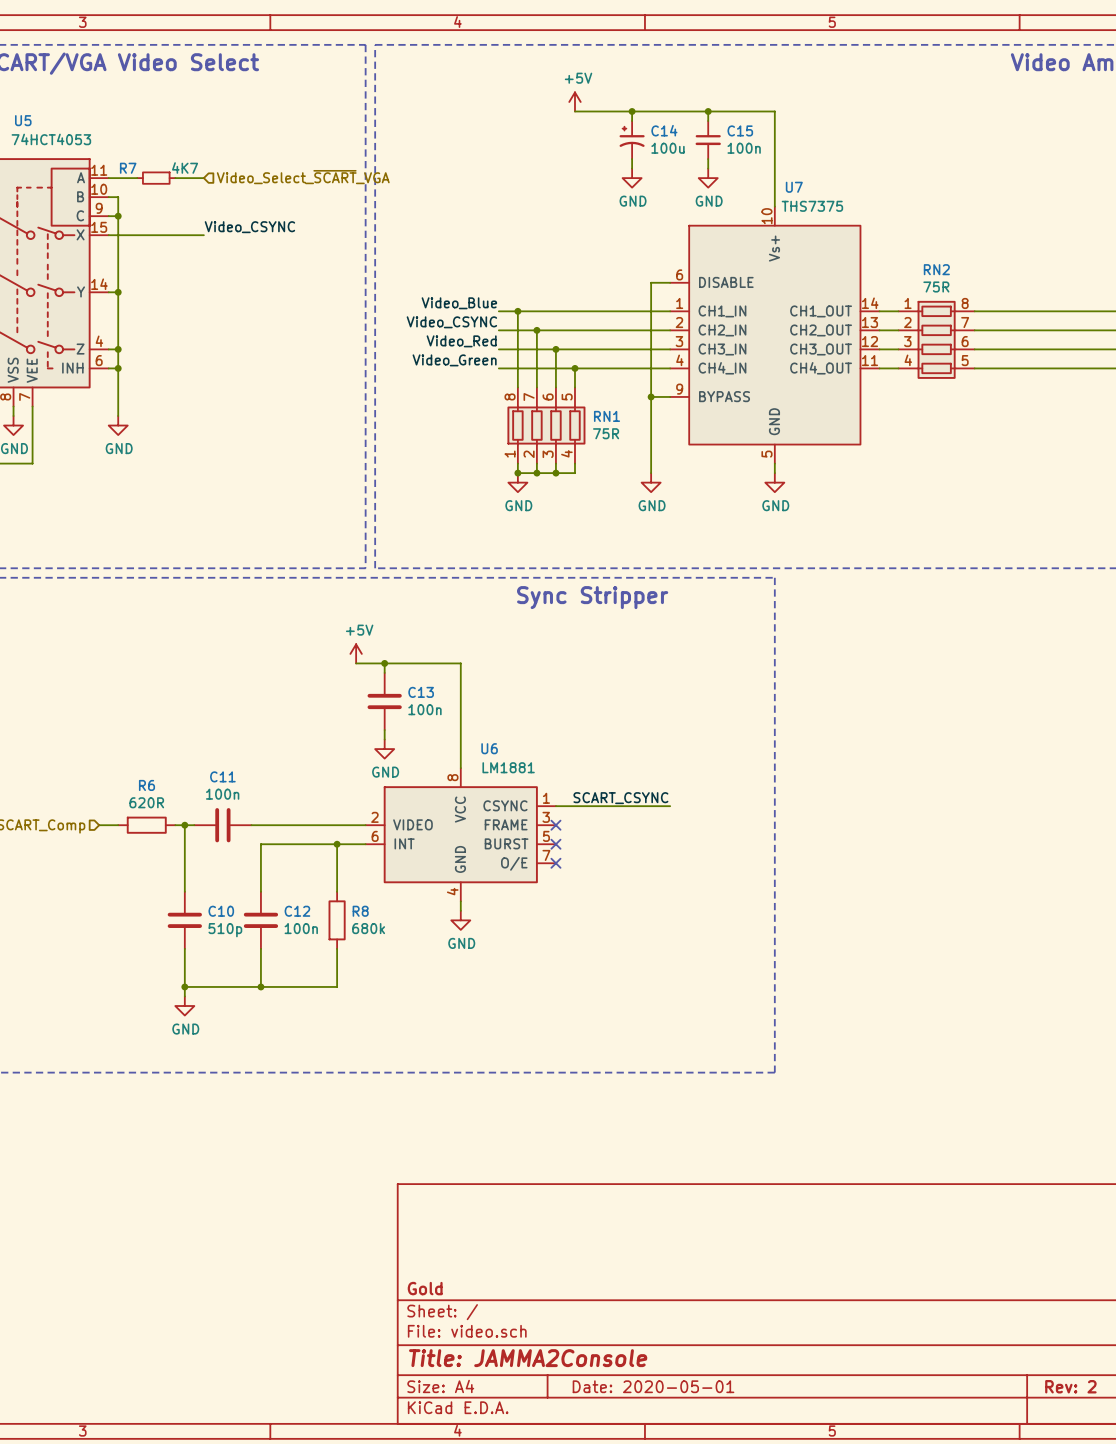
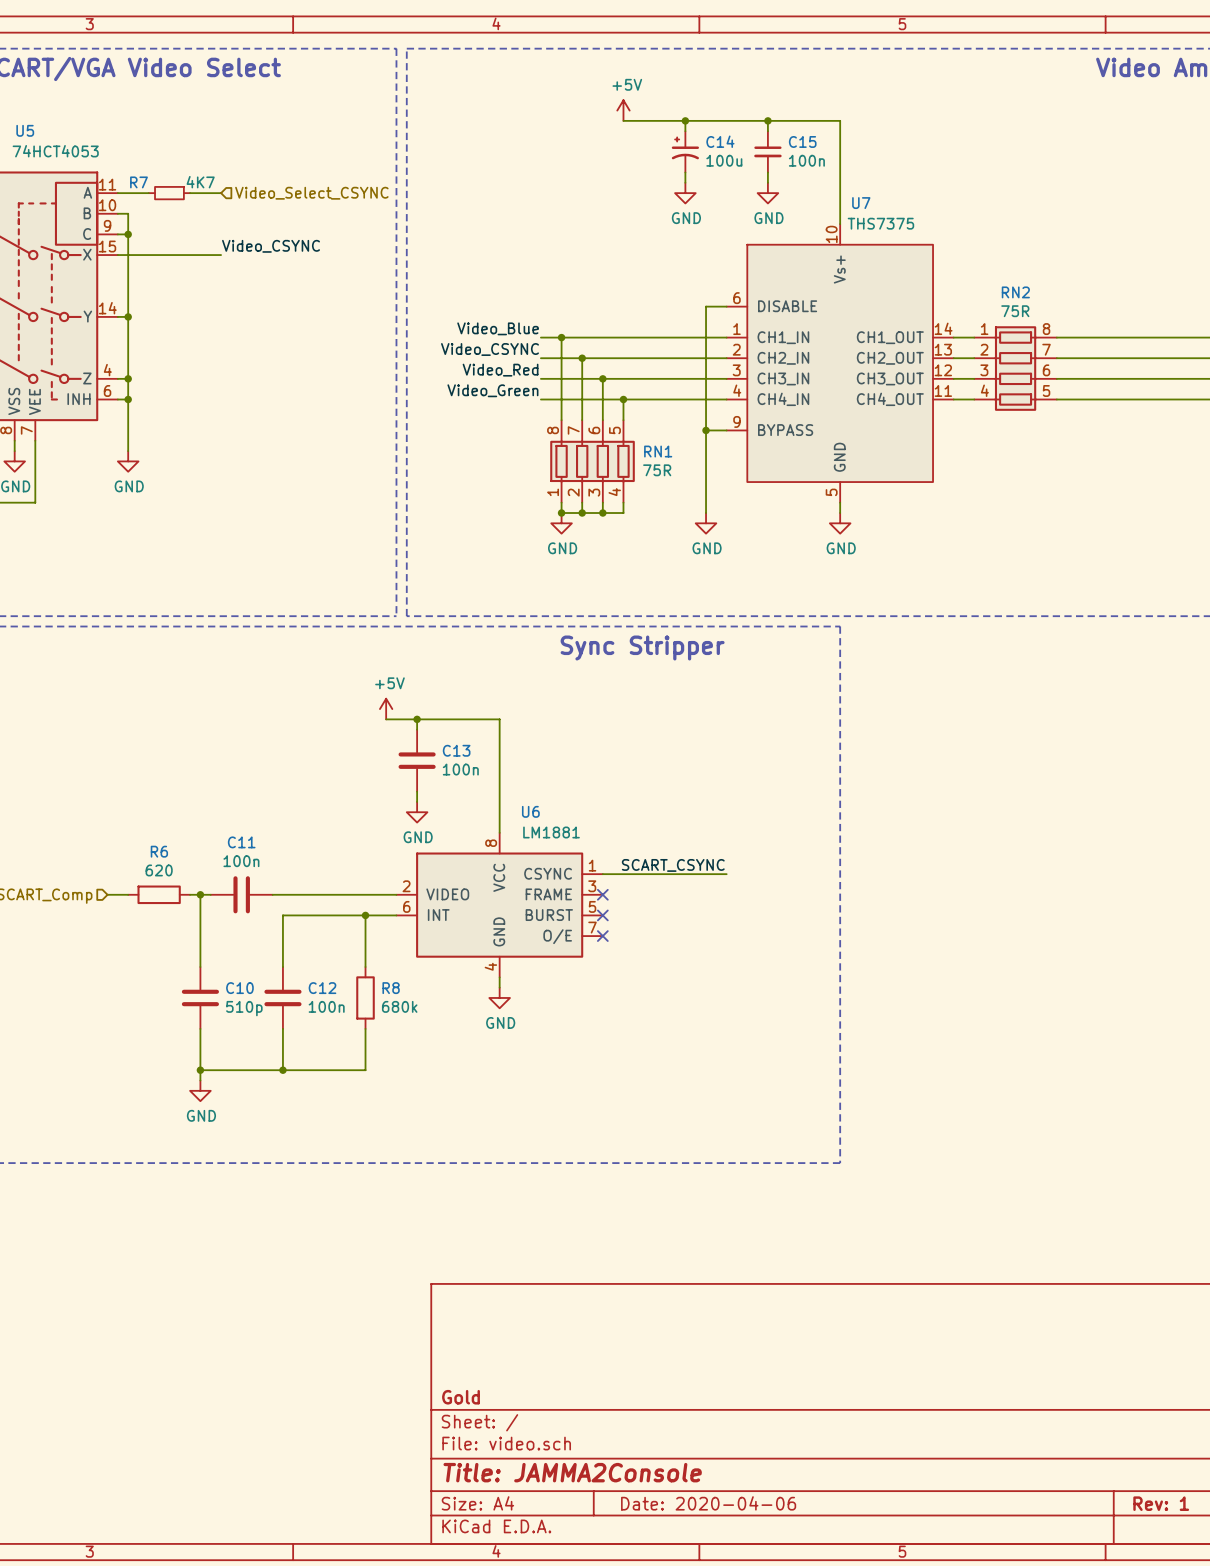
hierarchical label: Video_Select_~{SCART}_VGA (303, 177) -> Video_Select_CSYNC (311, 193)
R6 value: 620R (146, 802) -> 620 (159, 870)
title block: Date: 2020-05-01 (653, 1386) -> Date: 2020-04-06 (708, 1503)
title block: Rev: 2 (1070, 1386) -> Rev: 1 (1161, 1503)

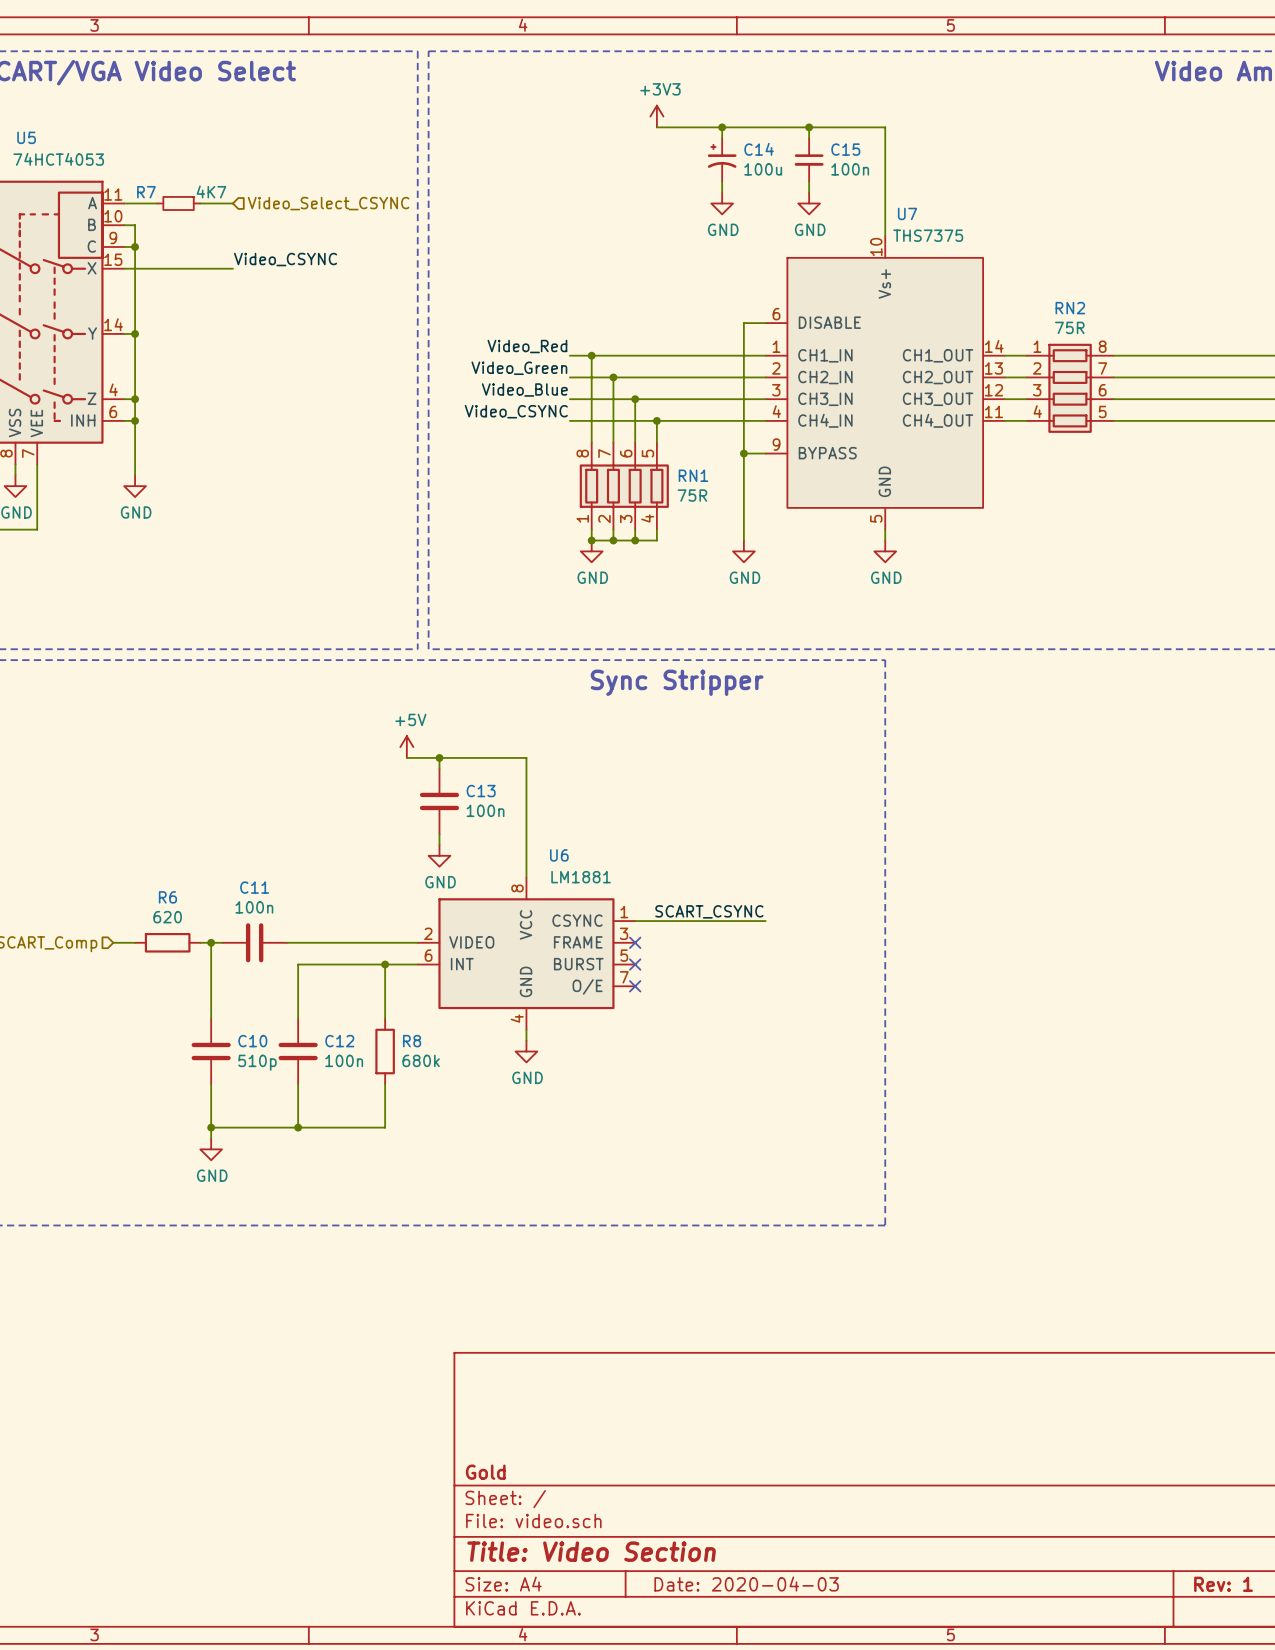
power symbol: +5V (623, 110) -> +3V3 (656, 116)
label: Video_Blue (498, 328) -> Video_Red (527, 346)
label: Video_CSYNC (489, 349) -> Video_Green (519, 368)
label: Video_Red (500, 370) -> Video_Blue (524, 390)
label: Video_Green (492, 390) -> Video_CSYNC (516, 411)
title block: Title: JAMMA2Console (572, 1472) -> Title: Video Section (591, 1551)
title block: Date: 2020-04-06 (708, 1503) -> Date: 2020-04-03 (746, 1584)

